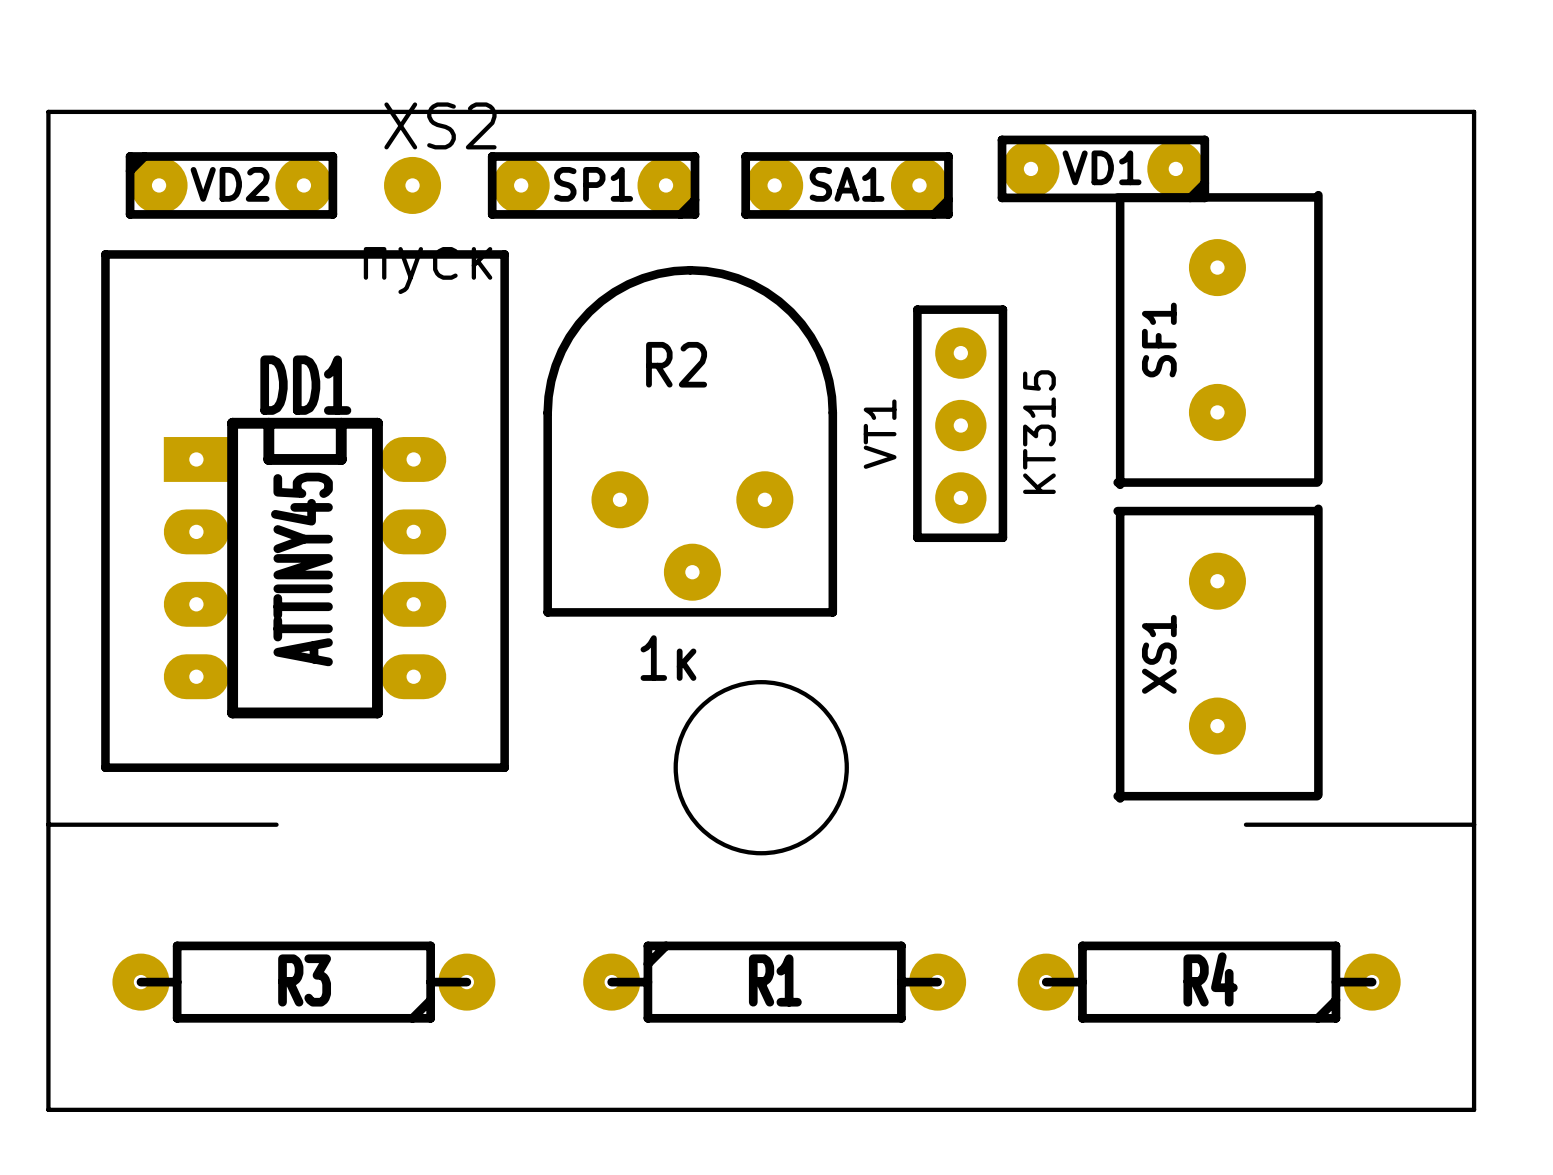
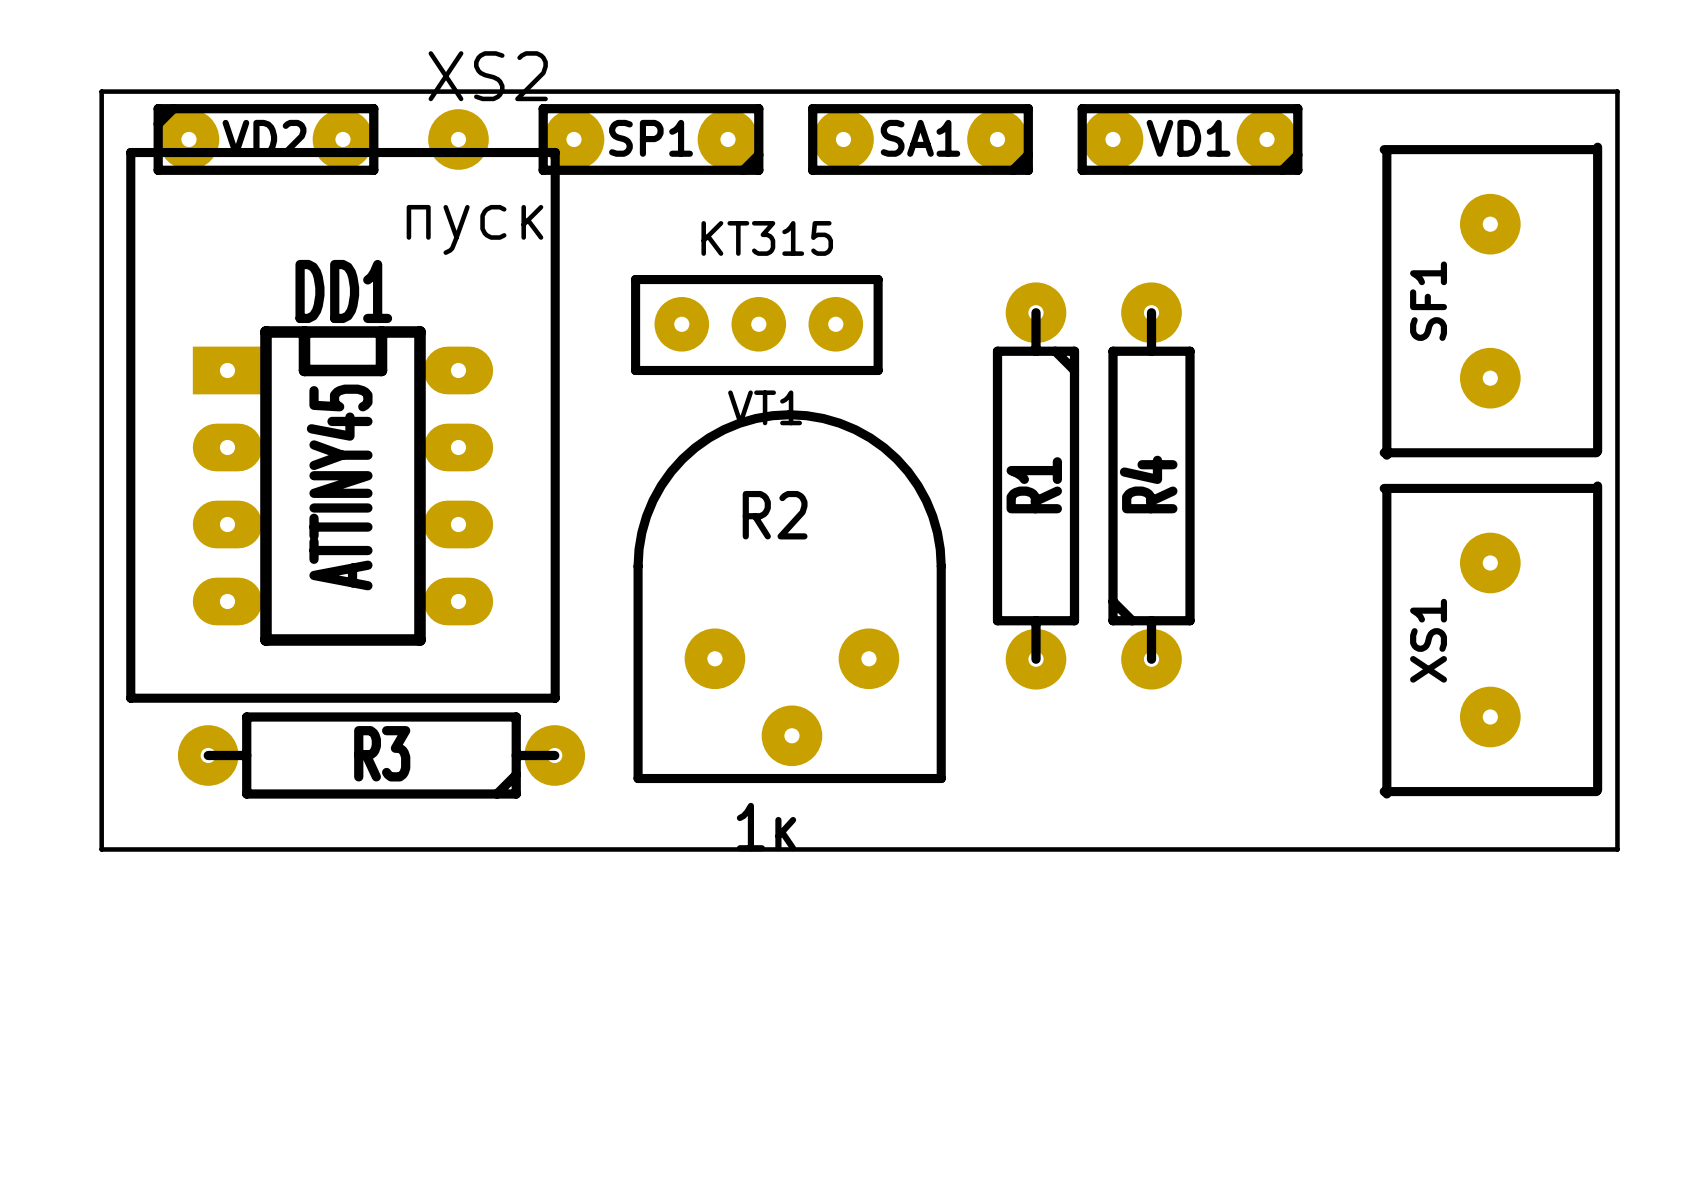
board edge: (48, 111) (48, 1109) (1474, 1109) (1474, 111) (48, 111) -> (101, 91) (101, 849) (1617, 849) (1617, 91) (101, 91)
VD1 position: (1103, 168) -> (1190, 139)
SF1 position: (1218, 340) -> (1490, 301)
VT1 rotation: 0° (960, 423) -> 90° counterclockwise (756, 325)
VT1 position: (960, 423) -> (756, 325)
R2 position: (690, 441) -> (789, 596)
DD1 position: (305, 511) -> (342, 425)
XS1 position: (1218, 653) -> (1490, 639)
round board edge: [673, 680, 849, 856] -> none
board edge: (48, 824) (276, 824) -> none
board edge: (1245, 824) (1474, 824) -> none
R3 position: (303, 982) -> (381, 755)
R1 rotation: 0° (774, 982) -> 90° clockwise (1036, 485)
R1 position: (774, 982) -> (1036, 485)
R4 rotation: 0° (1209, 982) -> 90° clockwise (1151, 485)
R4 position: (1209, 982) -> (1151, 485)

